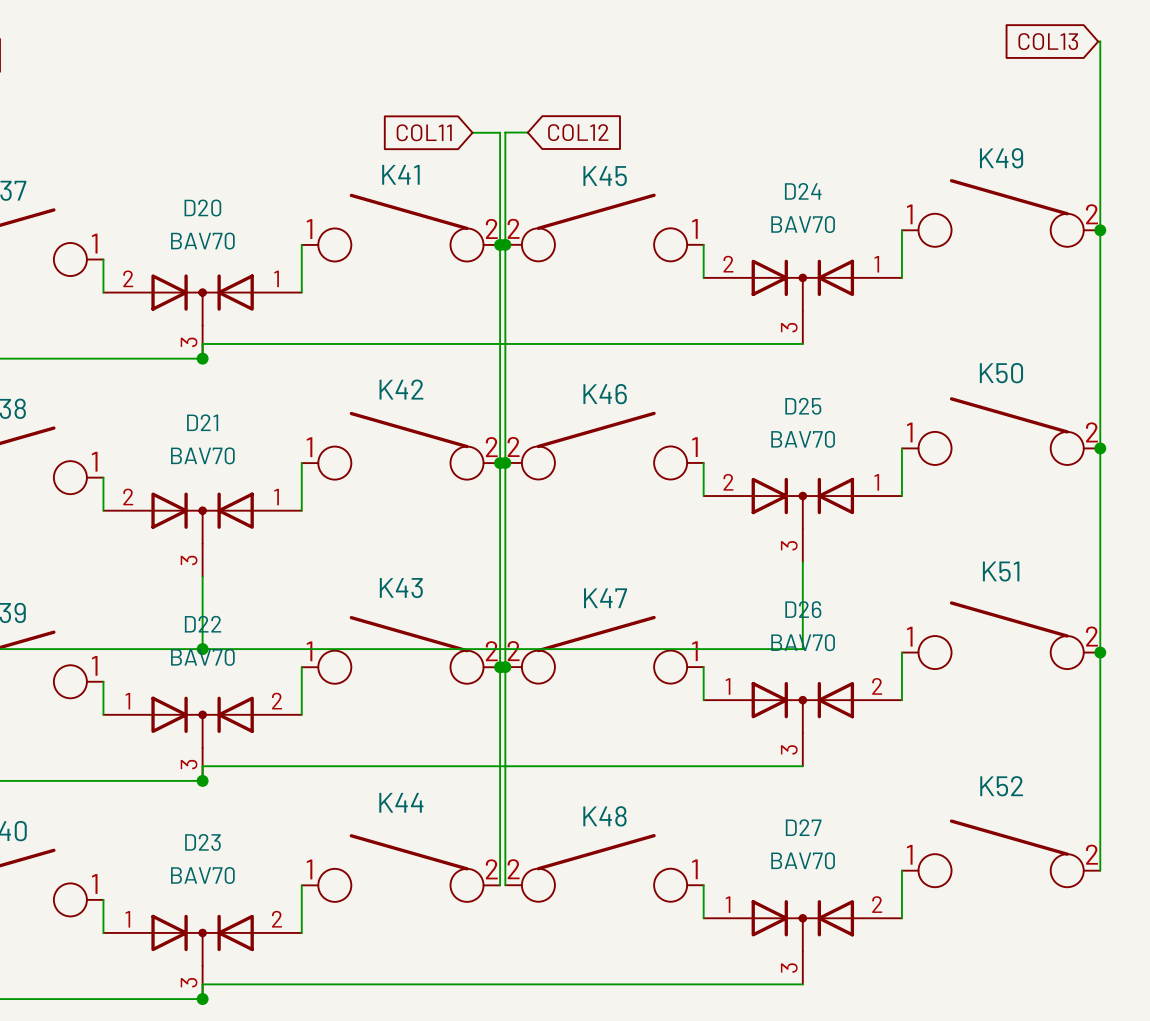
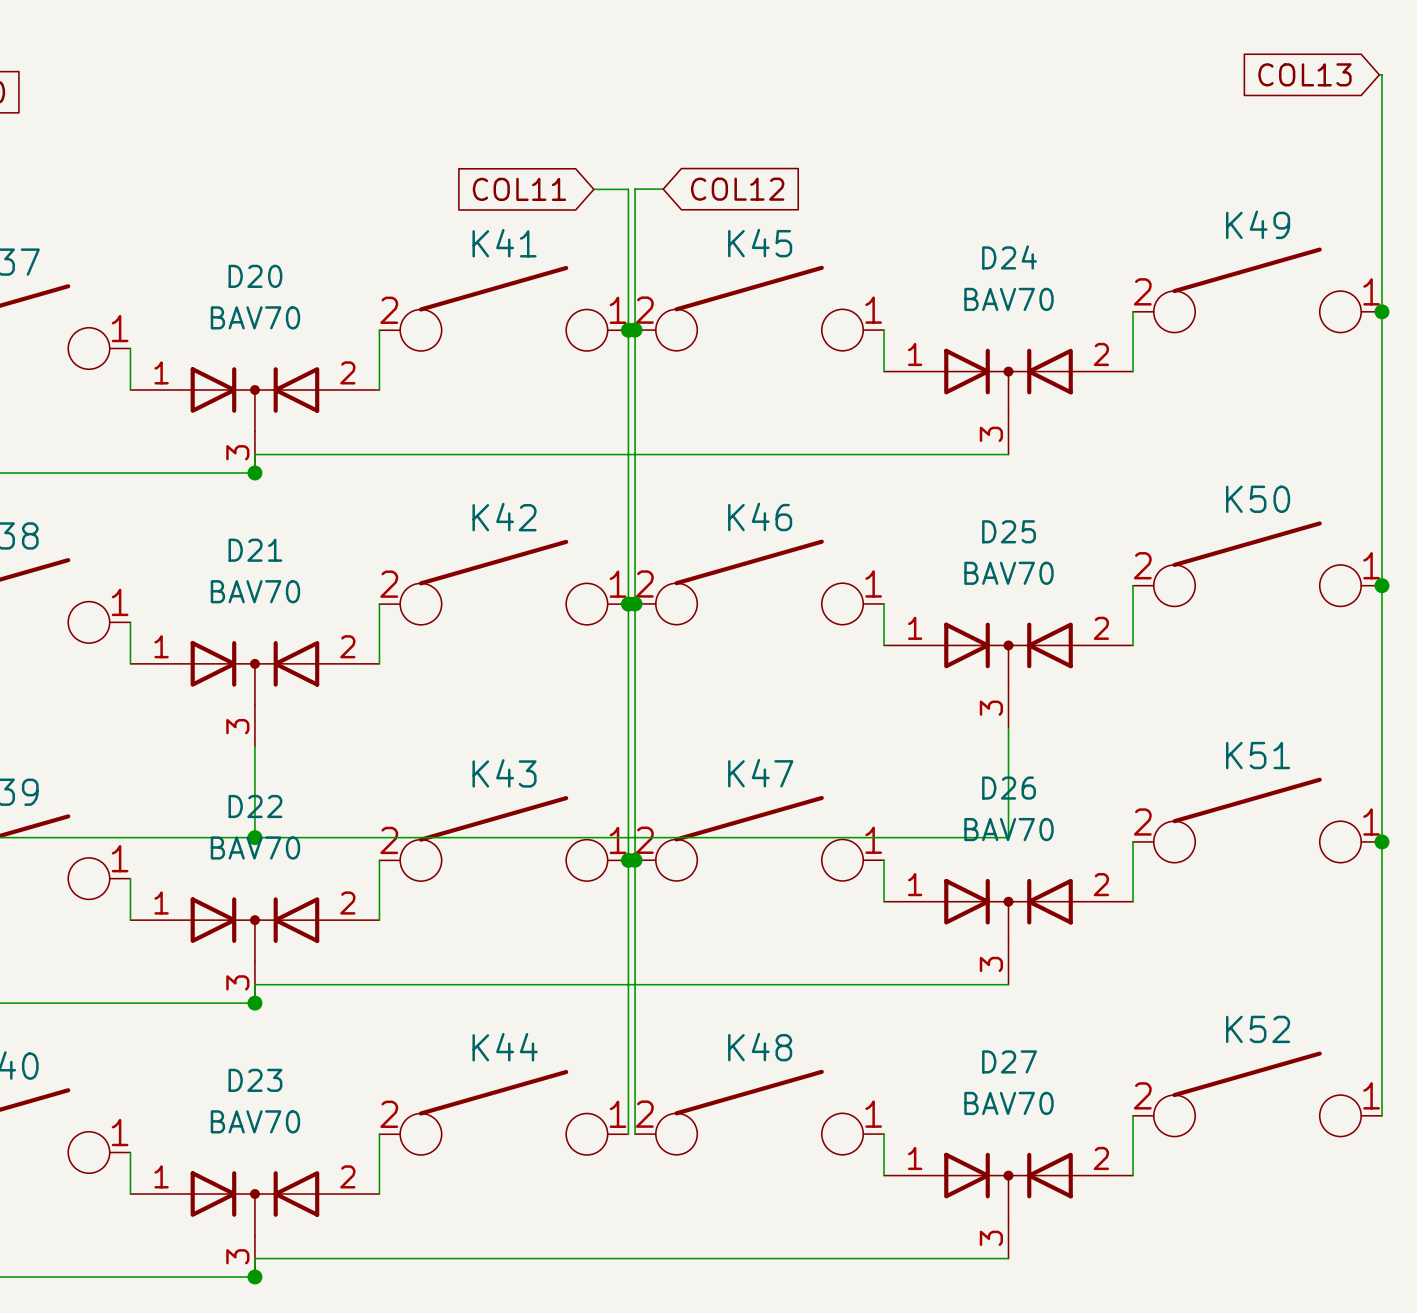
K49 flip: as is (1001, 212) -> left-right (1257, 290)
K41 flip: as is (400, 227) -> left-right (503, 308)
D24 flip: as is (802, 285) -> left-right (1008, 380)
D20 flip: as is (202, 299) -> left-right (254, 399)
K50 flip: as is (1001, 431) -> left-right (1257, 563)
K42 flip: as is (400, 445) -> left-right (503, 582)
D25 flip: as is (802, 503) -> left-right (1008, 654)
D21 flip: as is (202, 518) -> left-right (254, 673)
K51 flip: as is (1001, 635) -> left-right (1257, 820)
K43 flip: as is (400, 649) -> left-right (503, 838)
K52 flip: as is (1001, 853) -> left-right (1257, 1094)
K44 flip: as is (400, 868) -> left-right (503, 1112)

